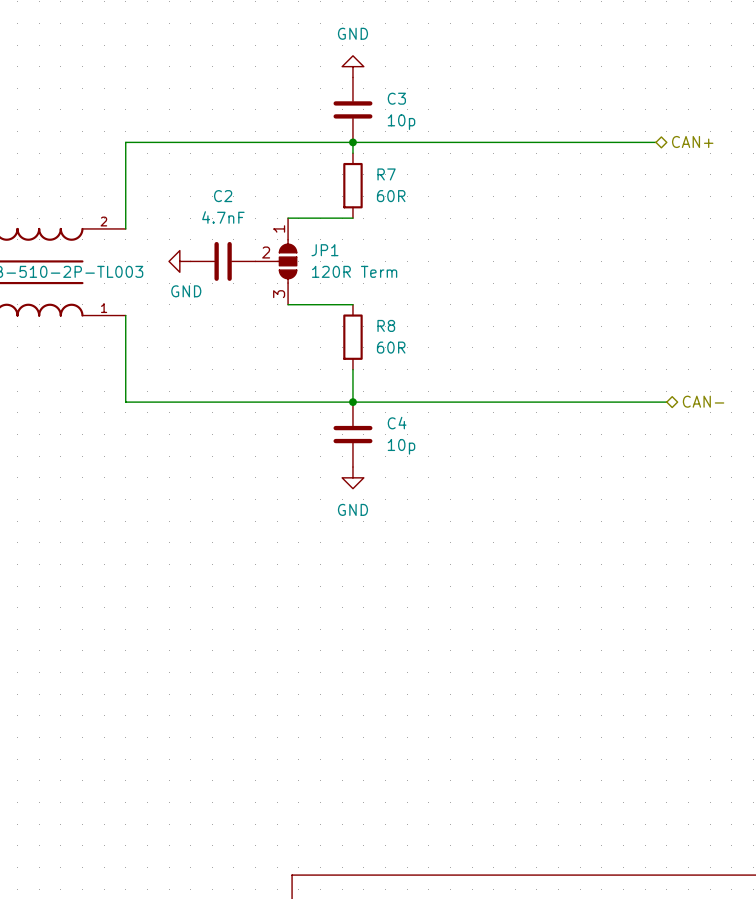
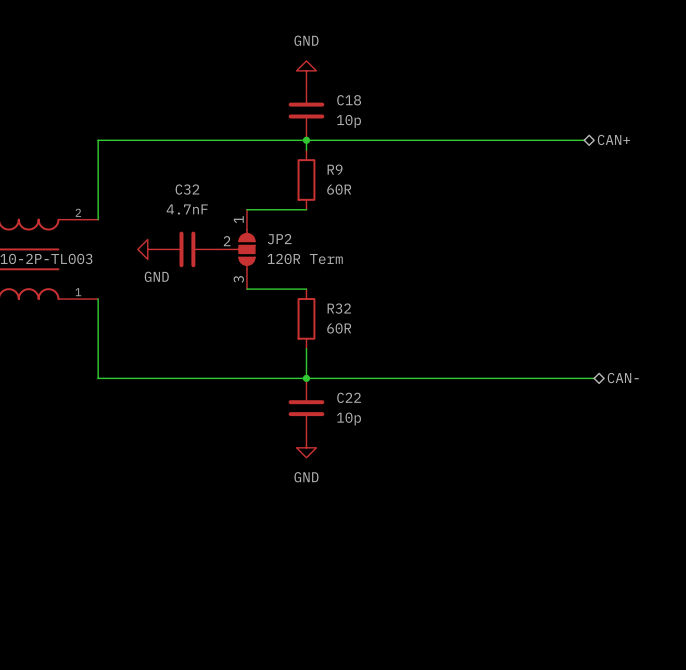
C3 name: C3 (396, 98) -> C18 (349, 100)
R7 name: R7 (386, 174) -> R9 (335, 169)
C2 name: C2 (223, 196) -> C32 (187, 189)
JP1 name: JP1 (324, 250) -> JP2 (279, 239)
R8 name: R8 (386, 325) -> R32 (339, 308)
C4 name: C4 (397, 423) -> C22 (349, 397)

